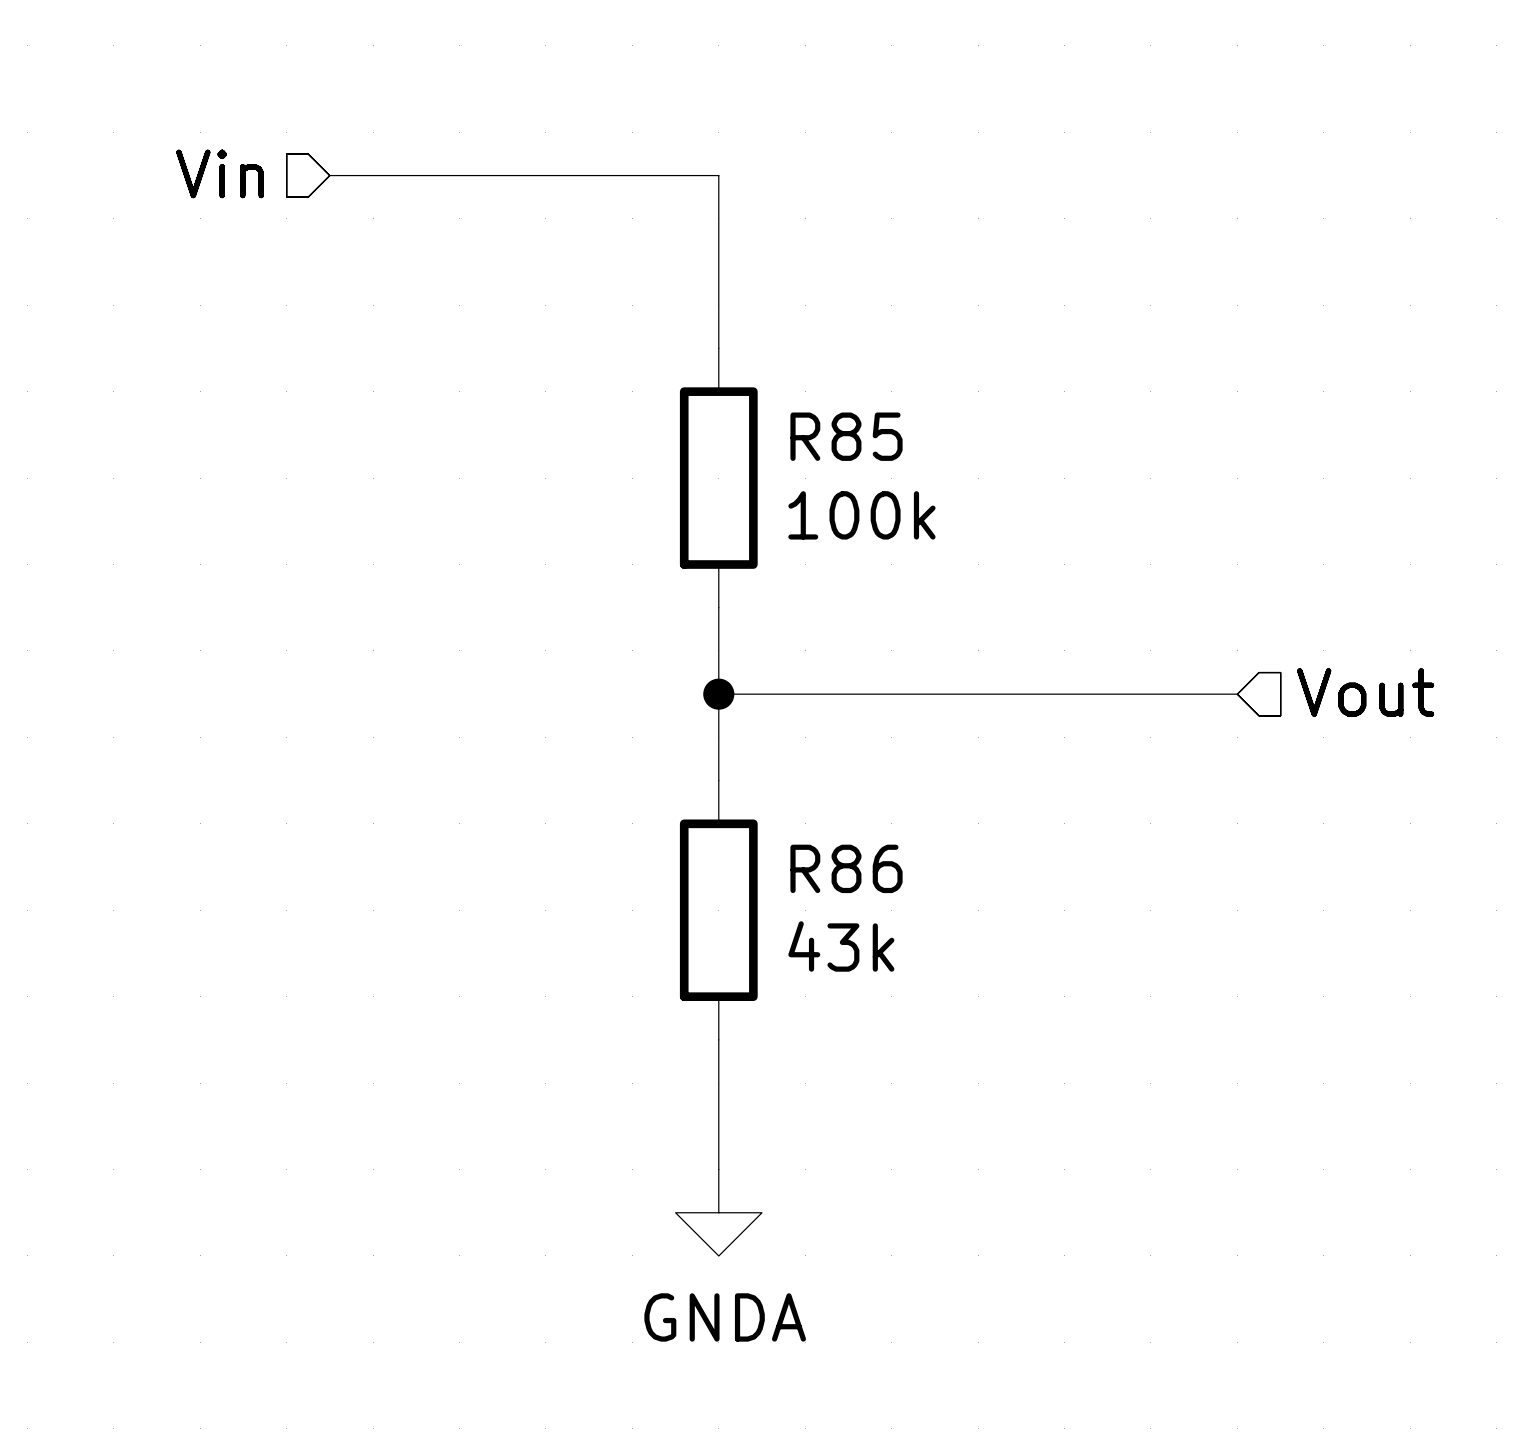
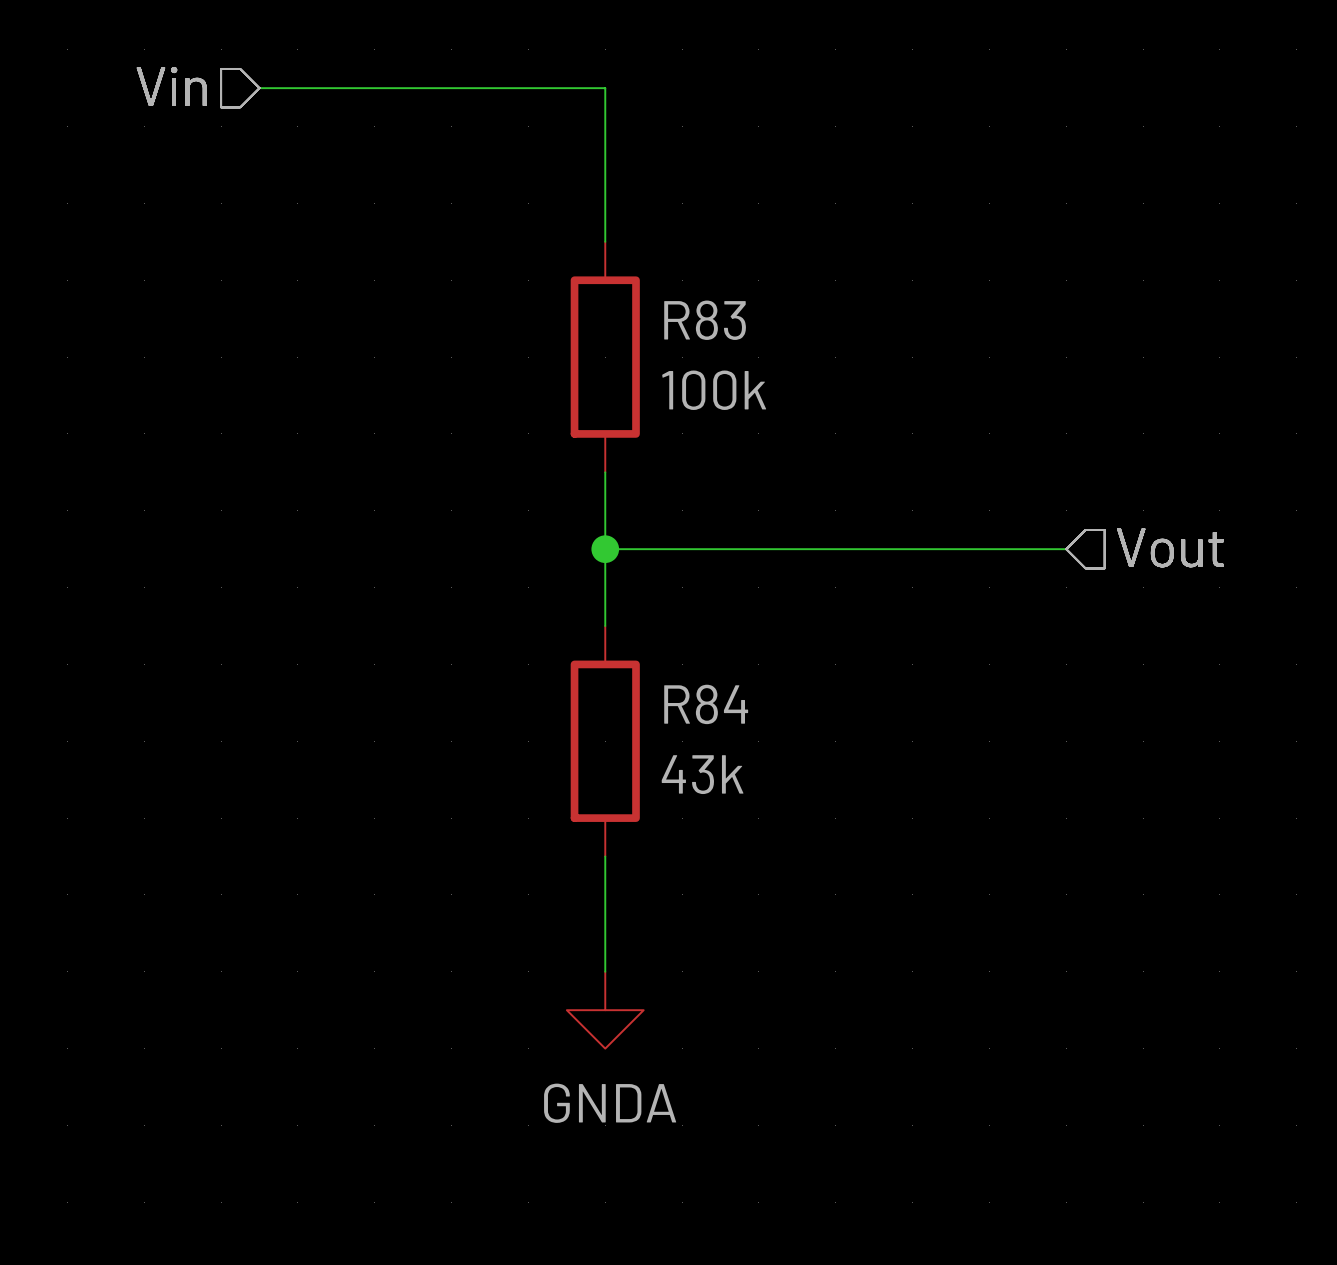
R85 name: R85 (846, 436) -> R83 (705, 320)
R86 name: R86 (846, 868) -> R84 (706, 704)

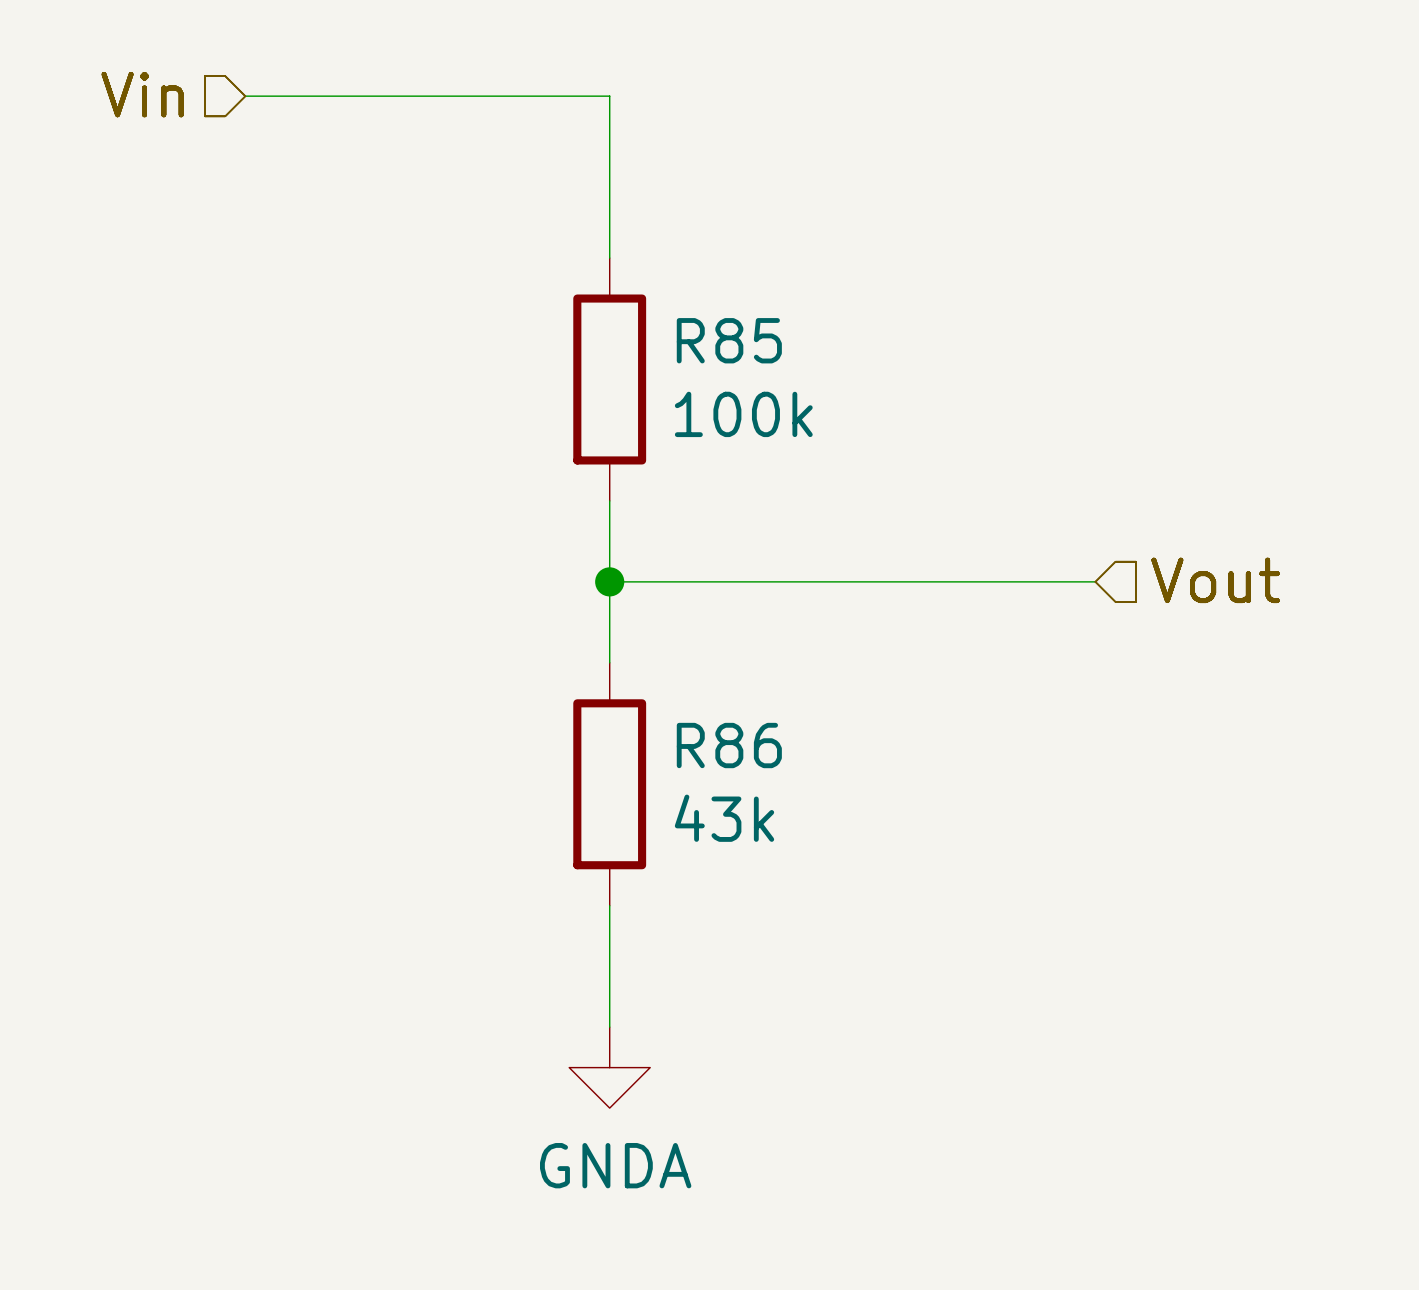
R83 name: R83 (705, 320) -> R85 (729, 340)
R84 name: R84 (706, 704) -> R86 (729, 745)

